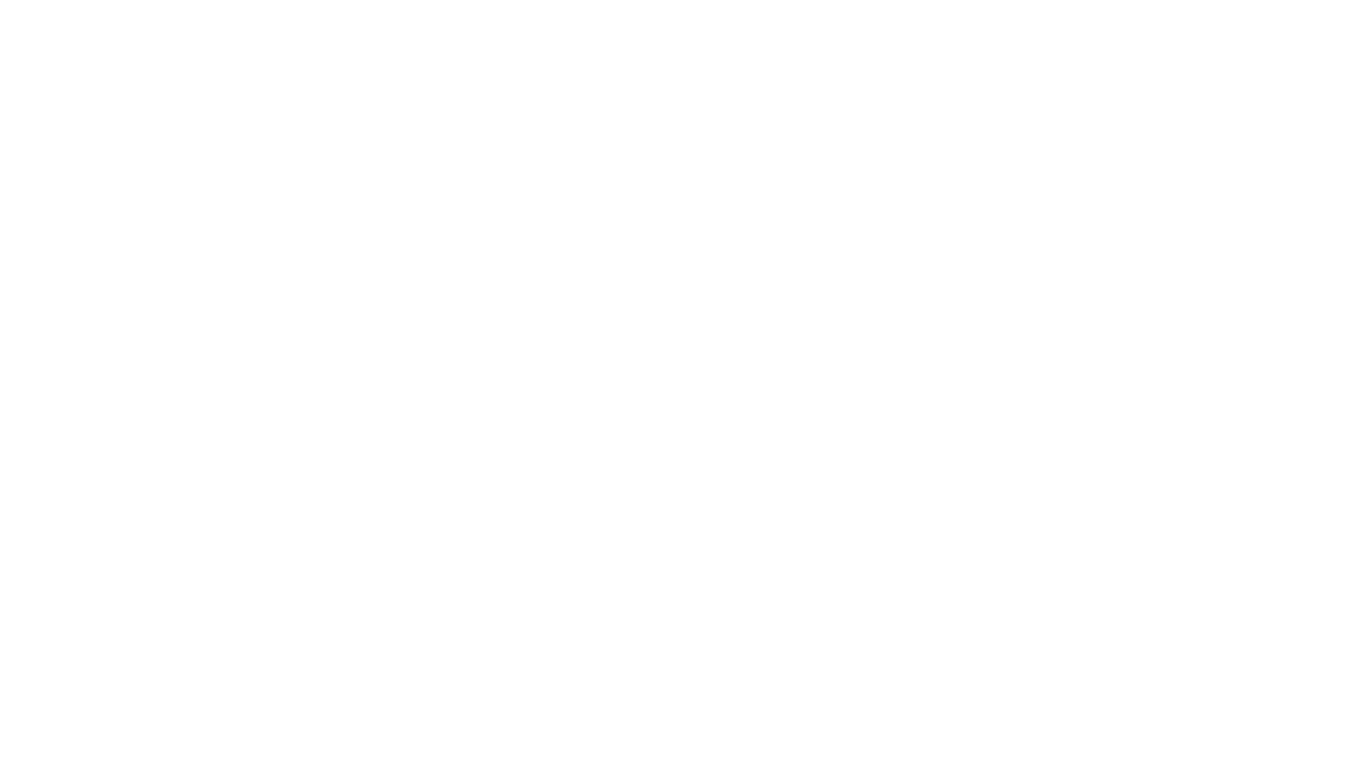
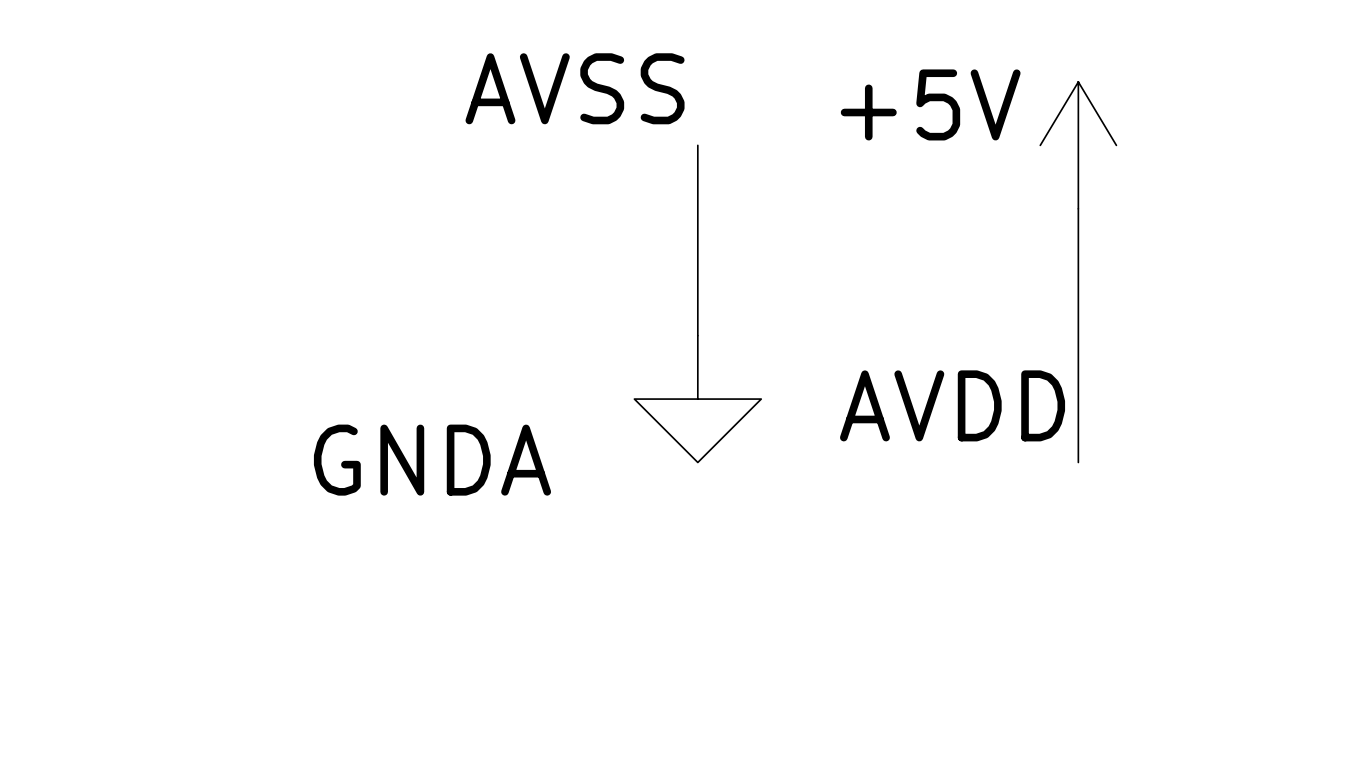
label: none -> AVSS (575, 88)
wire: none -> (697, 145) (697, 335)
power symbol: none -> +5V (1078, 145)
wire: none -> (1078, 208) (1078, 462)
power symbol: none -> GNDA (697, 399)
label: none -> AVDD (952, 405)

